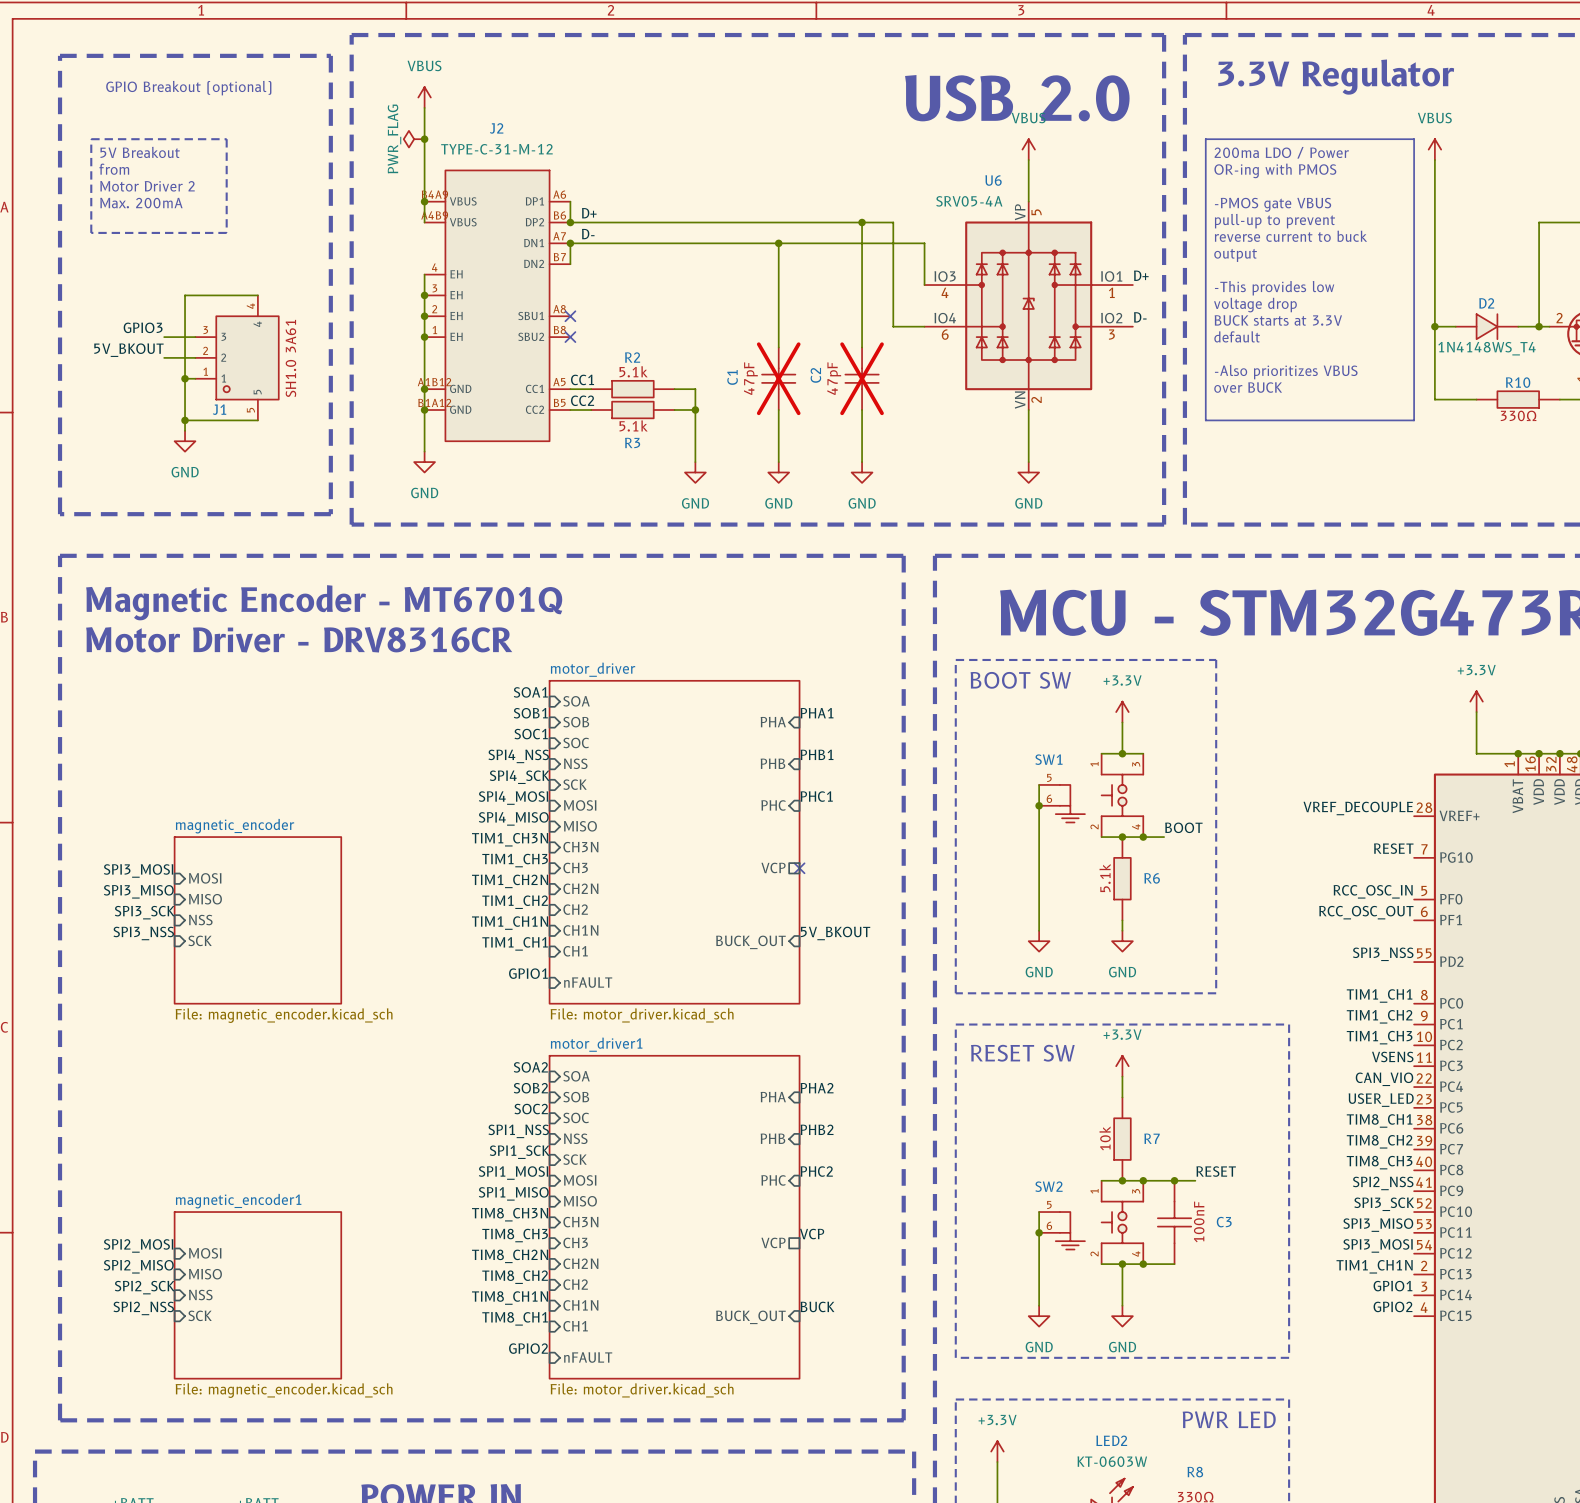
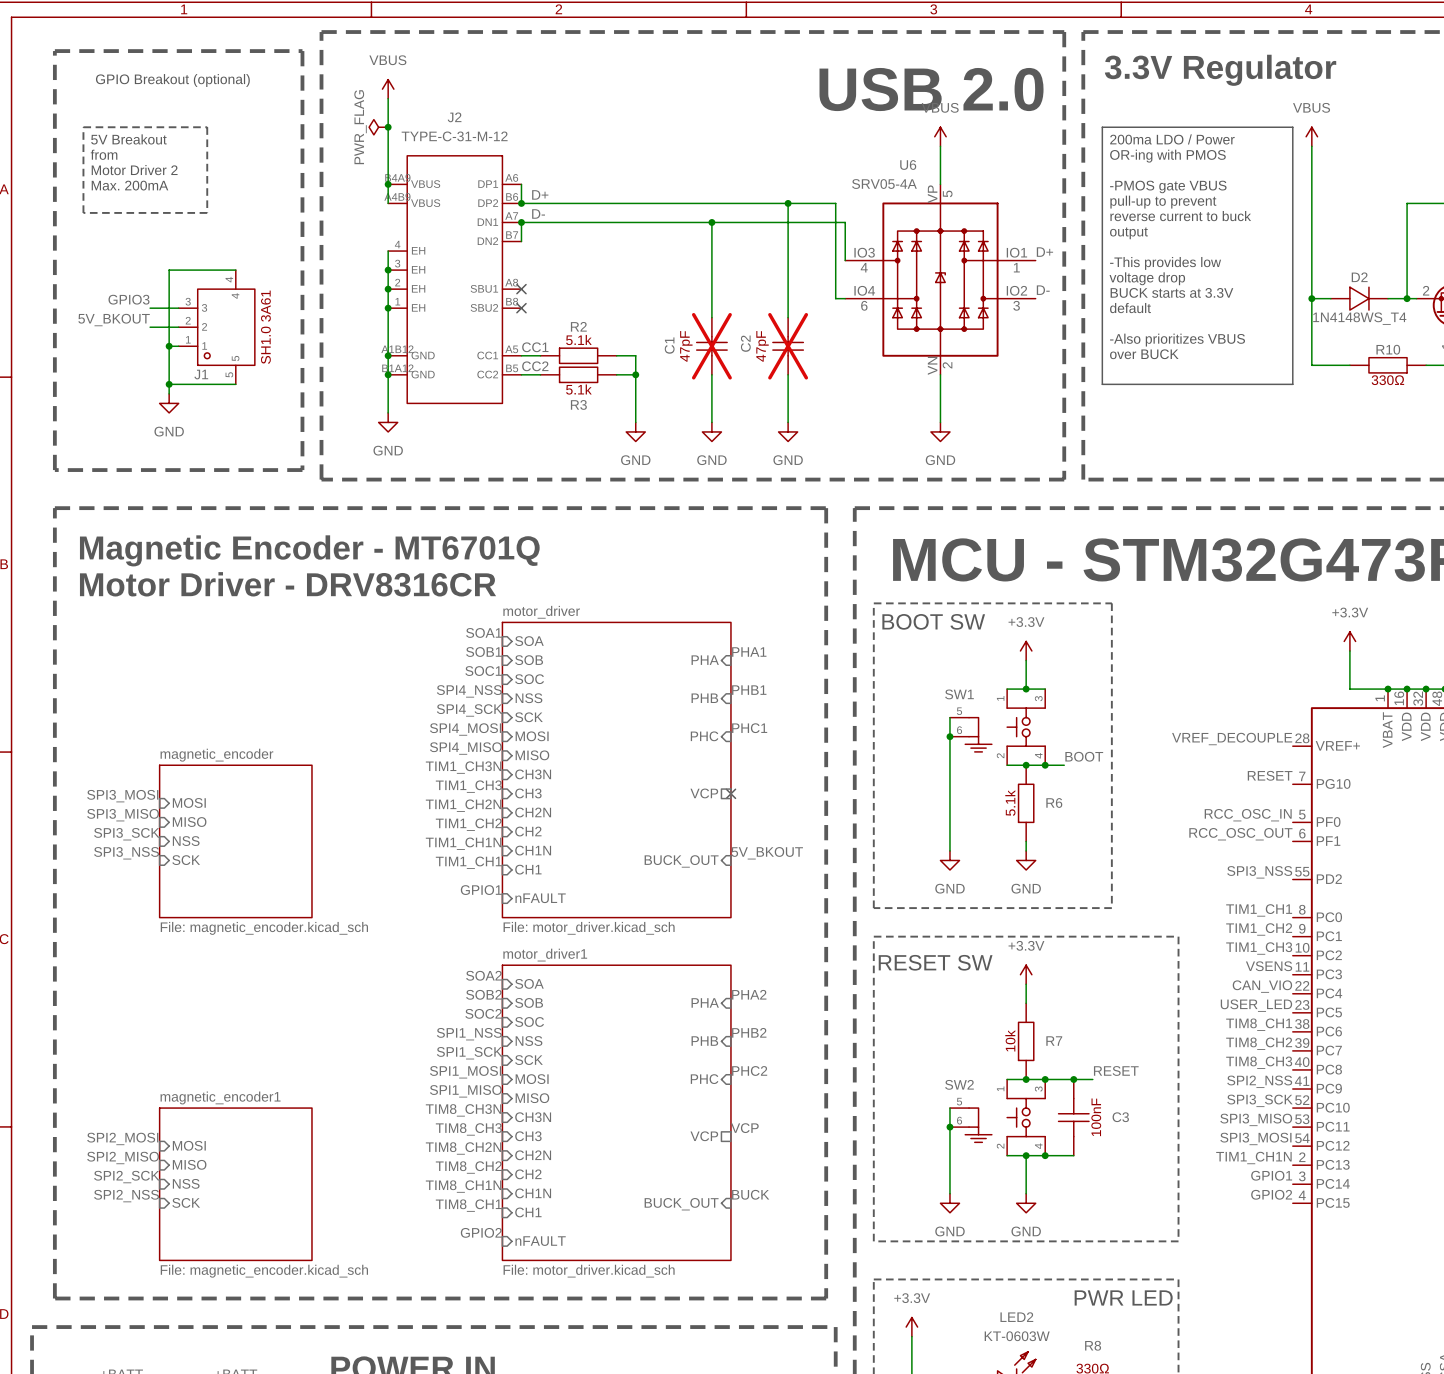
wire: (893, 222) (893, 326) (914, 326) -> (816, 203) (835, 203) (835, 298)

